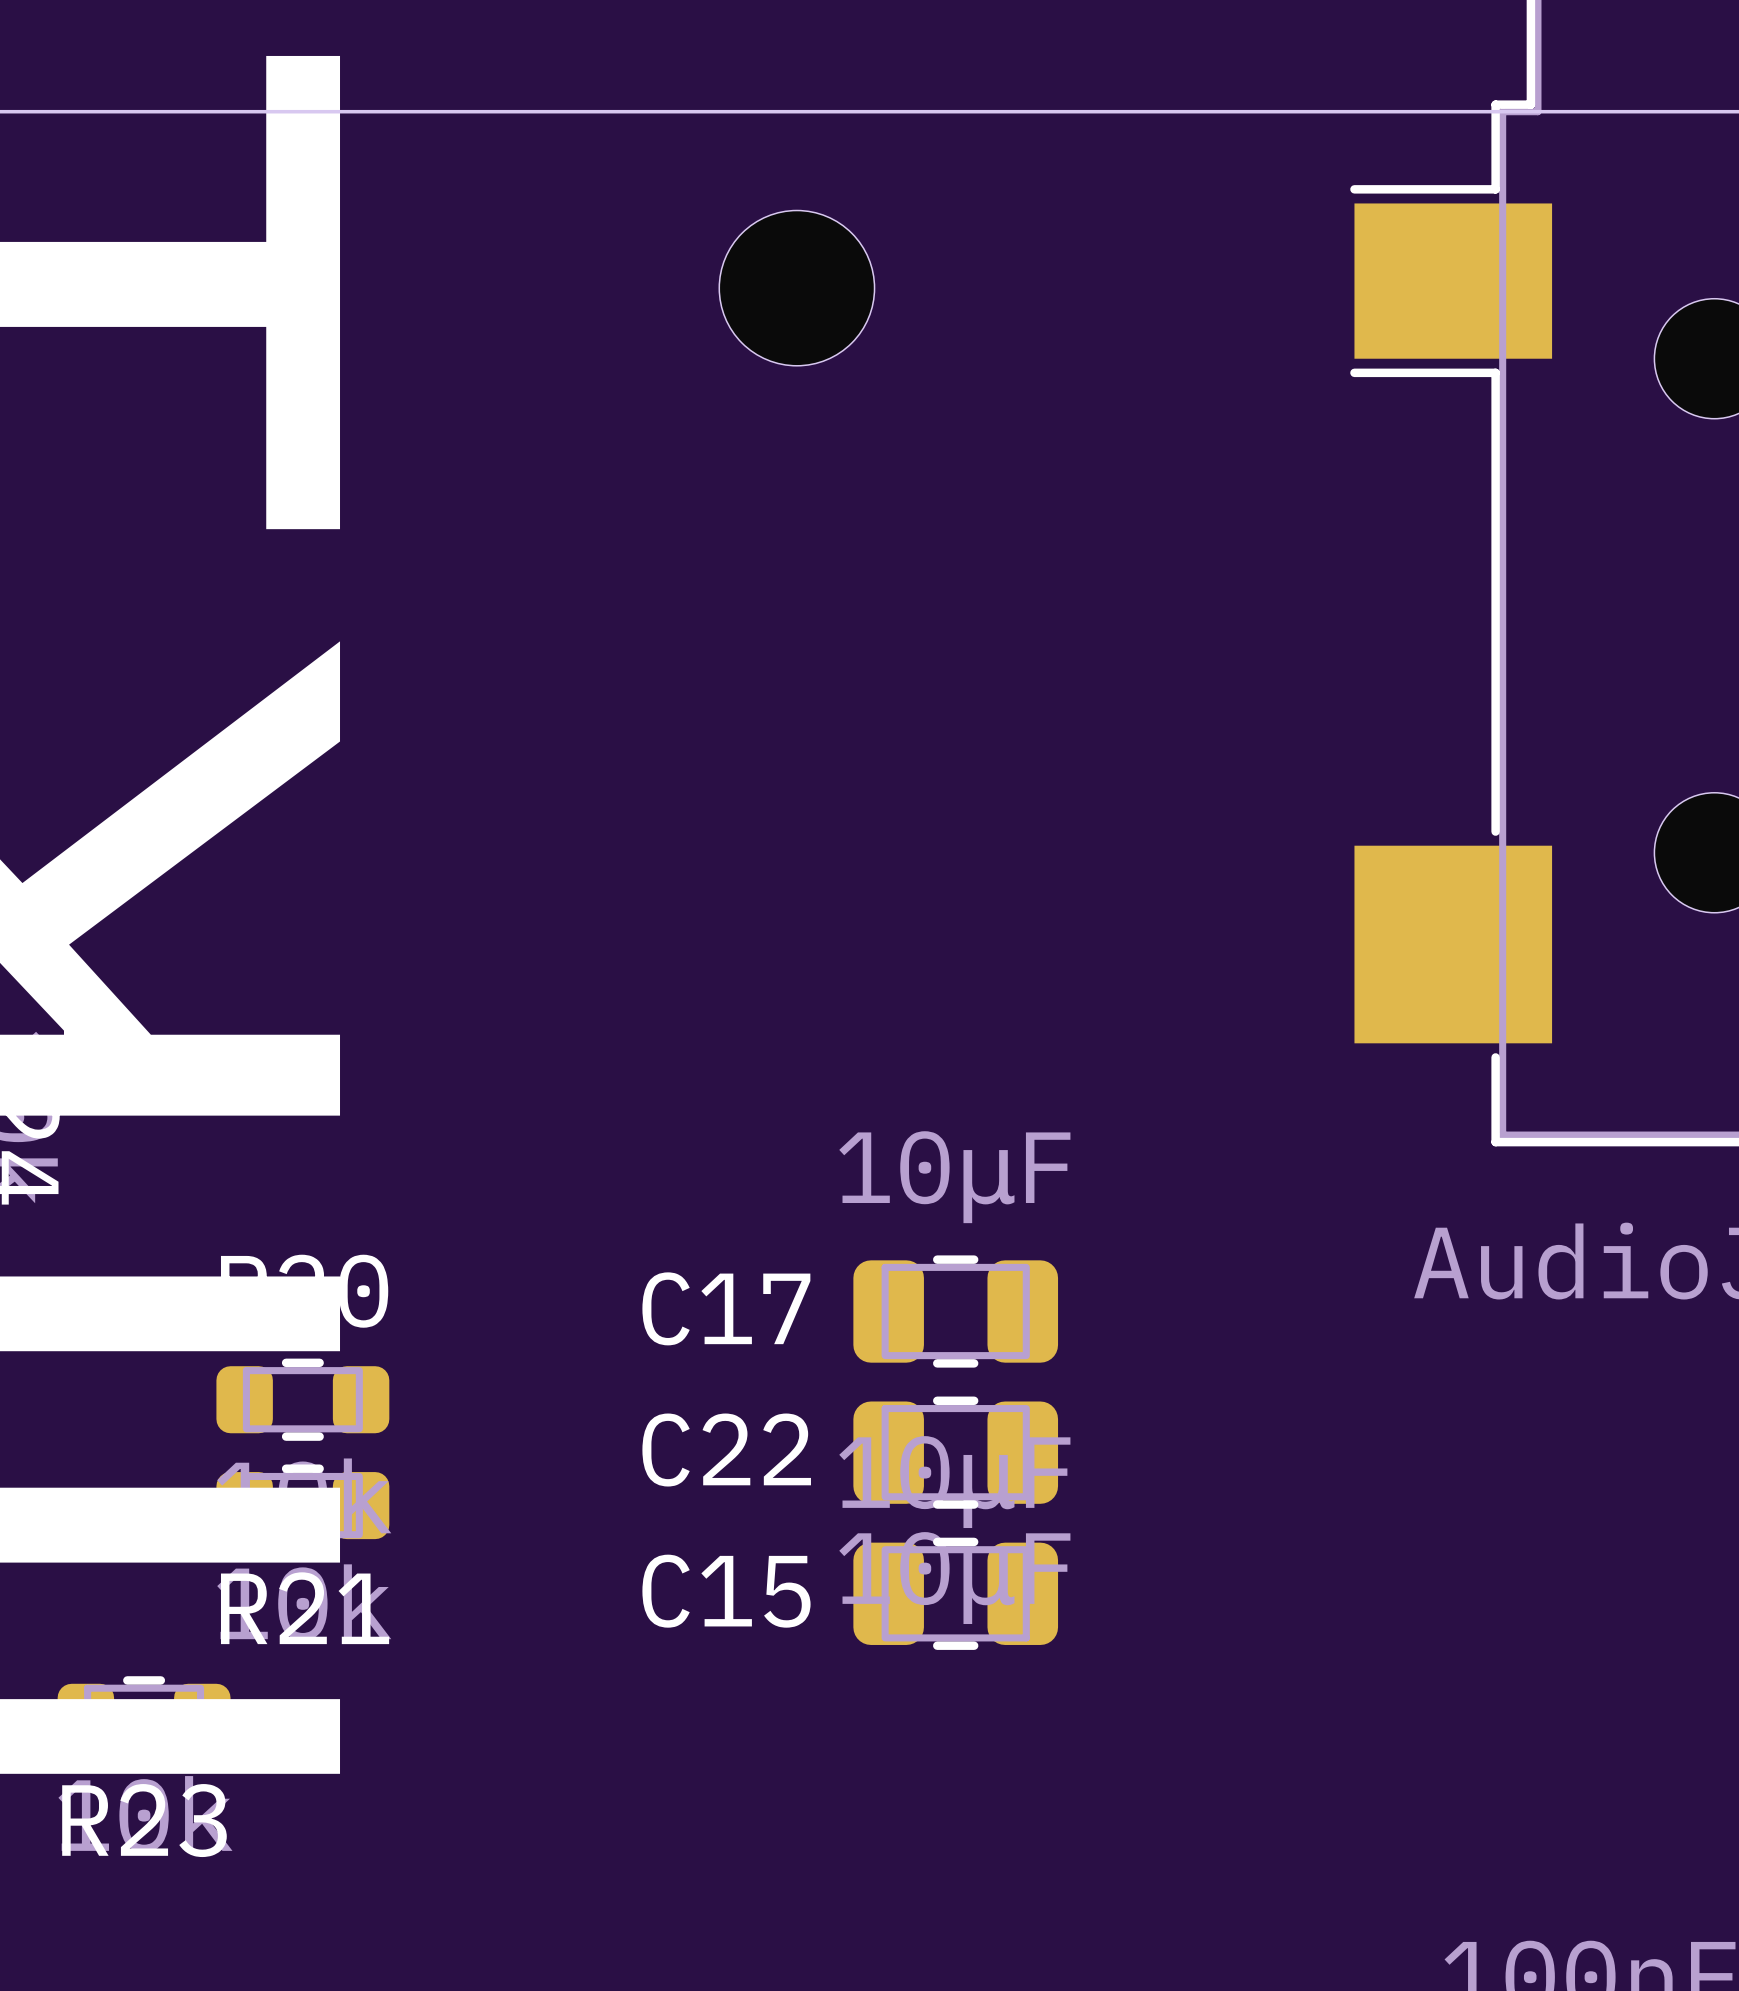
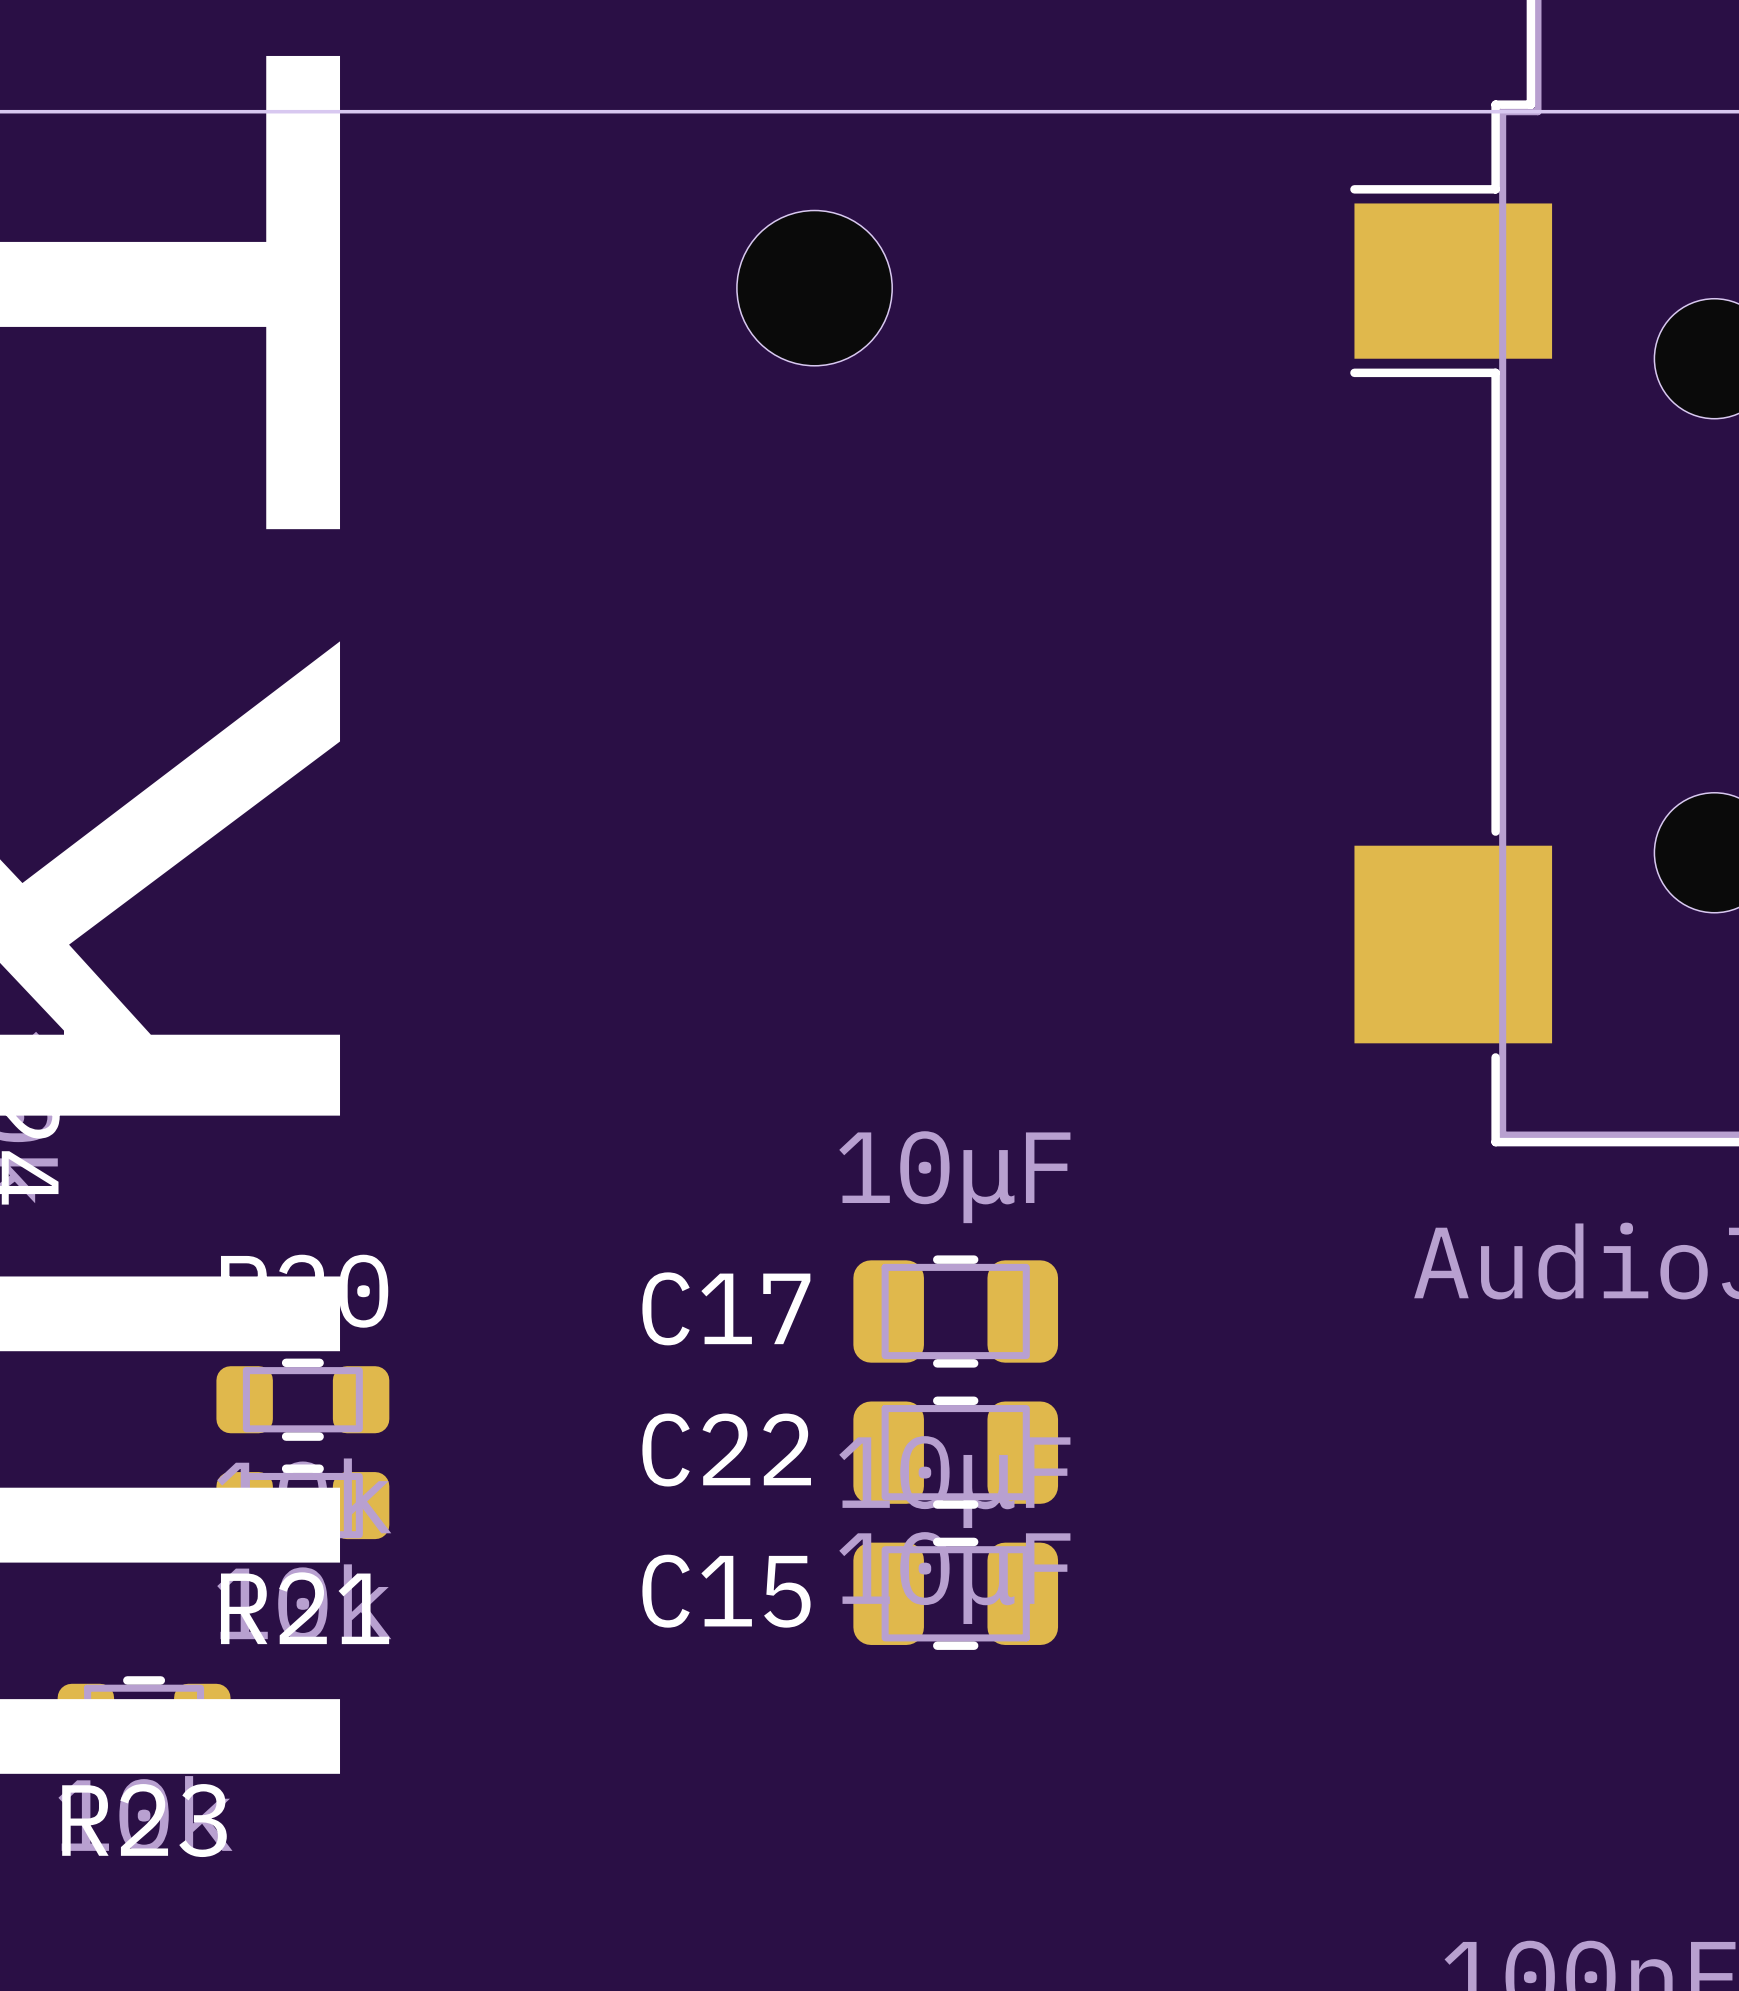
part position: (796, 288) -> (814, 288)

